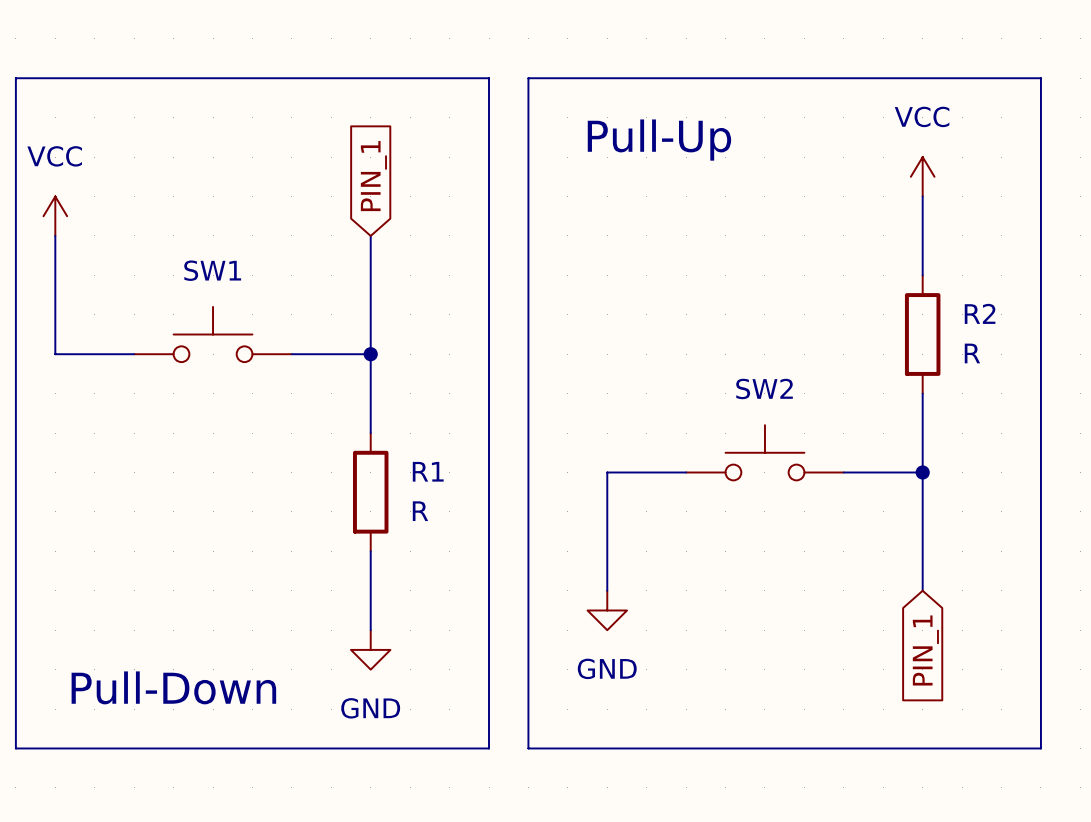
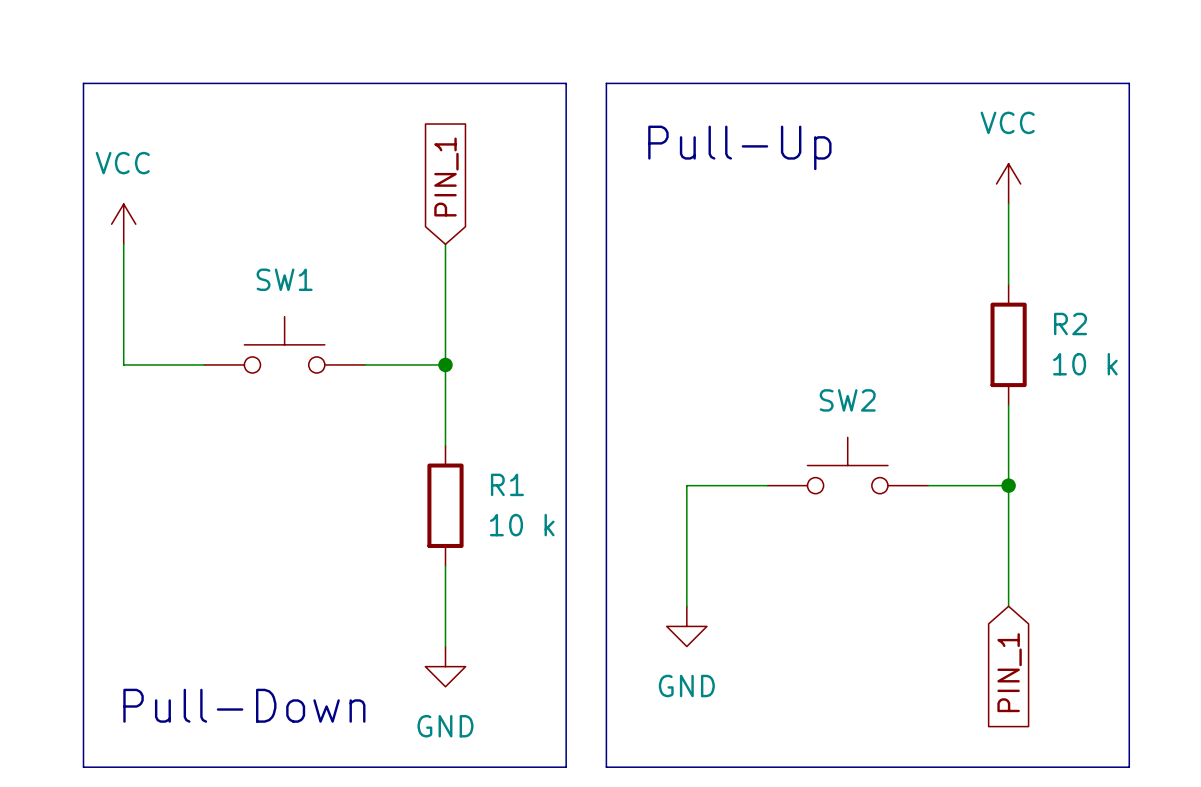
R2 value: R (972, 353) -> 10 k (1085, 364)
R1 value: R (420, 511) -> 10 k (522, 525)

